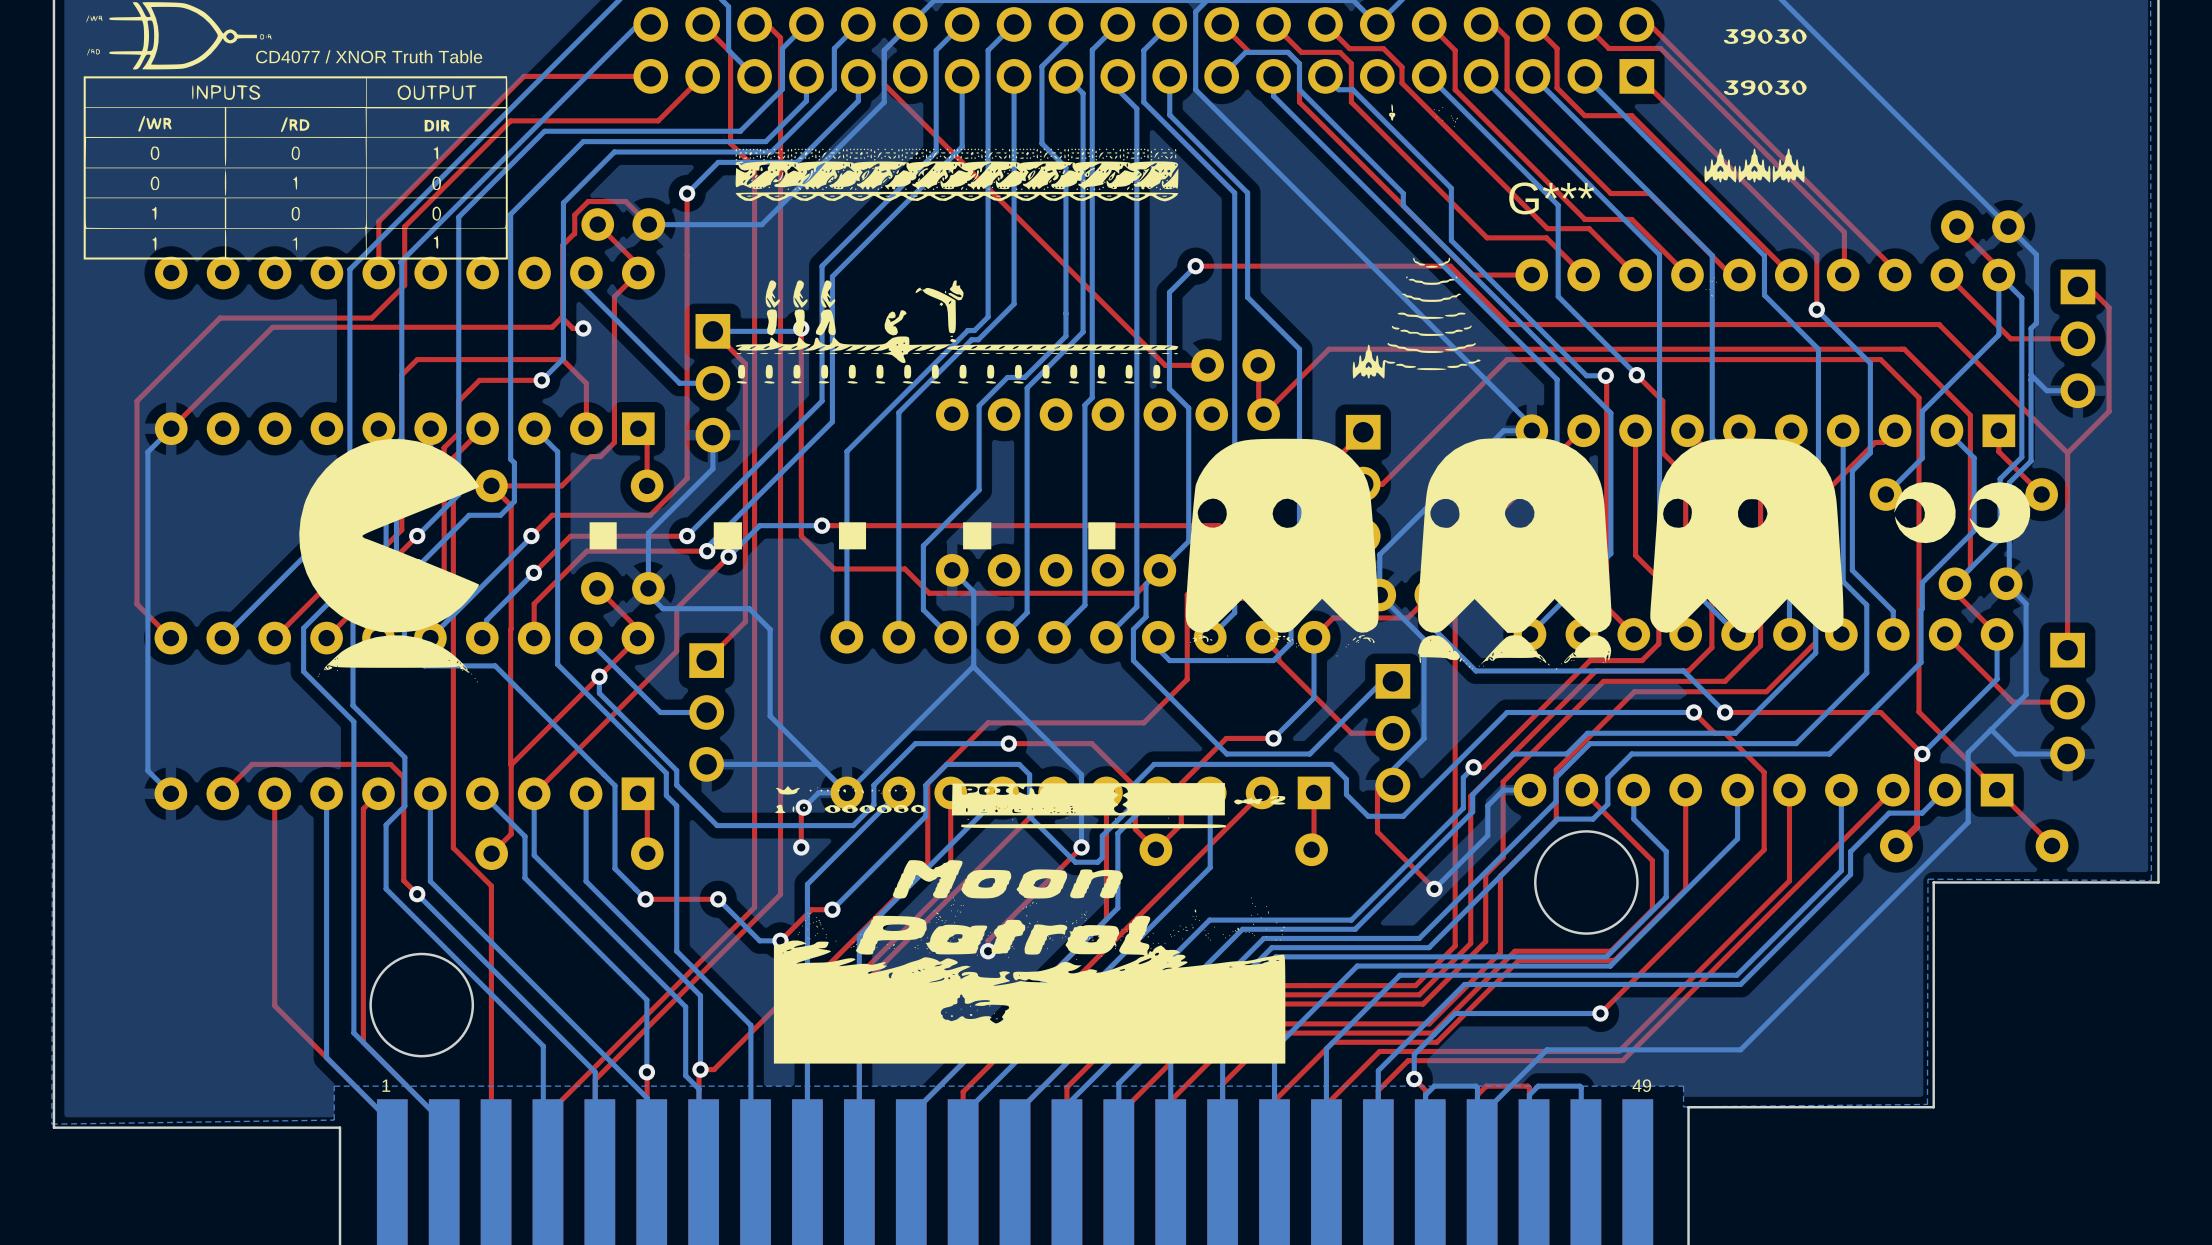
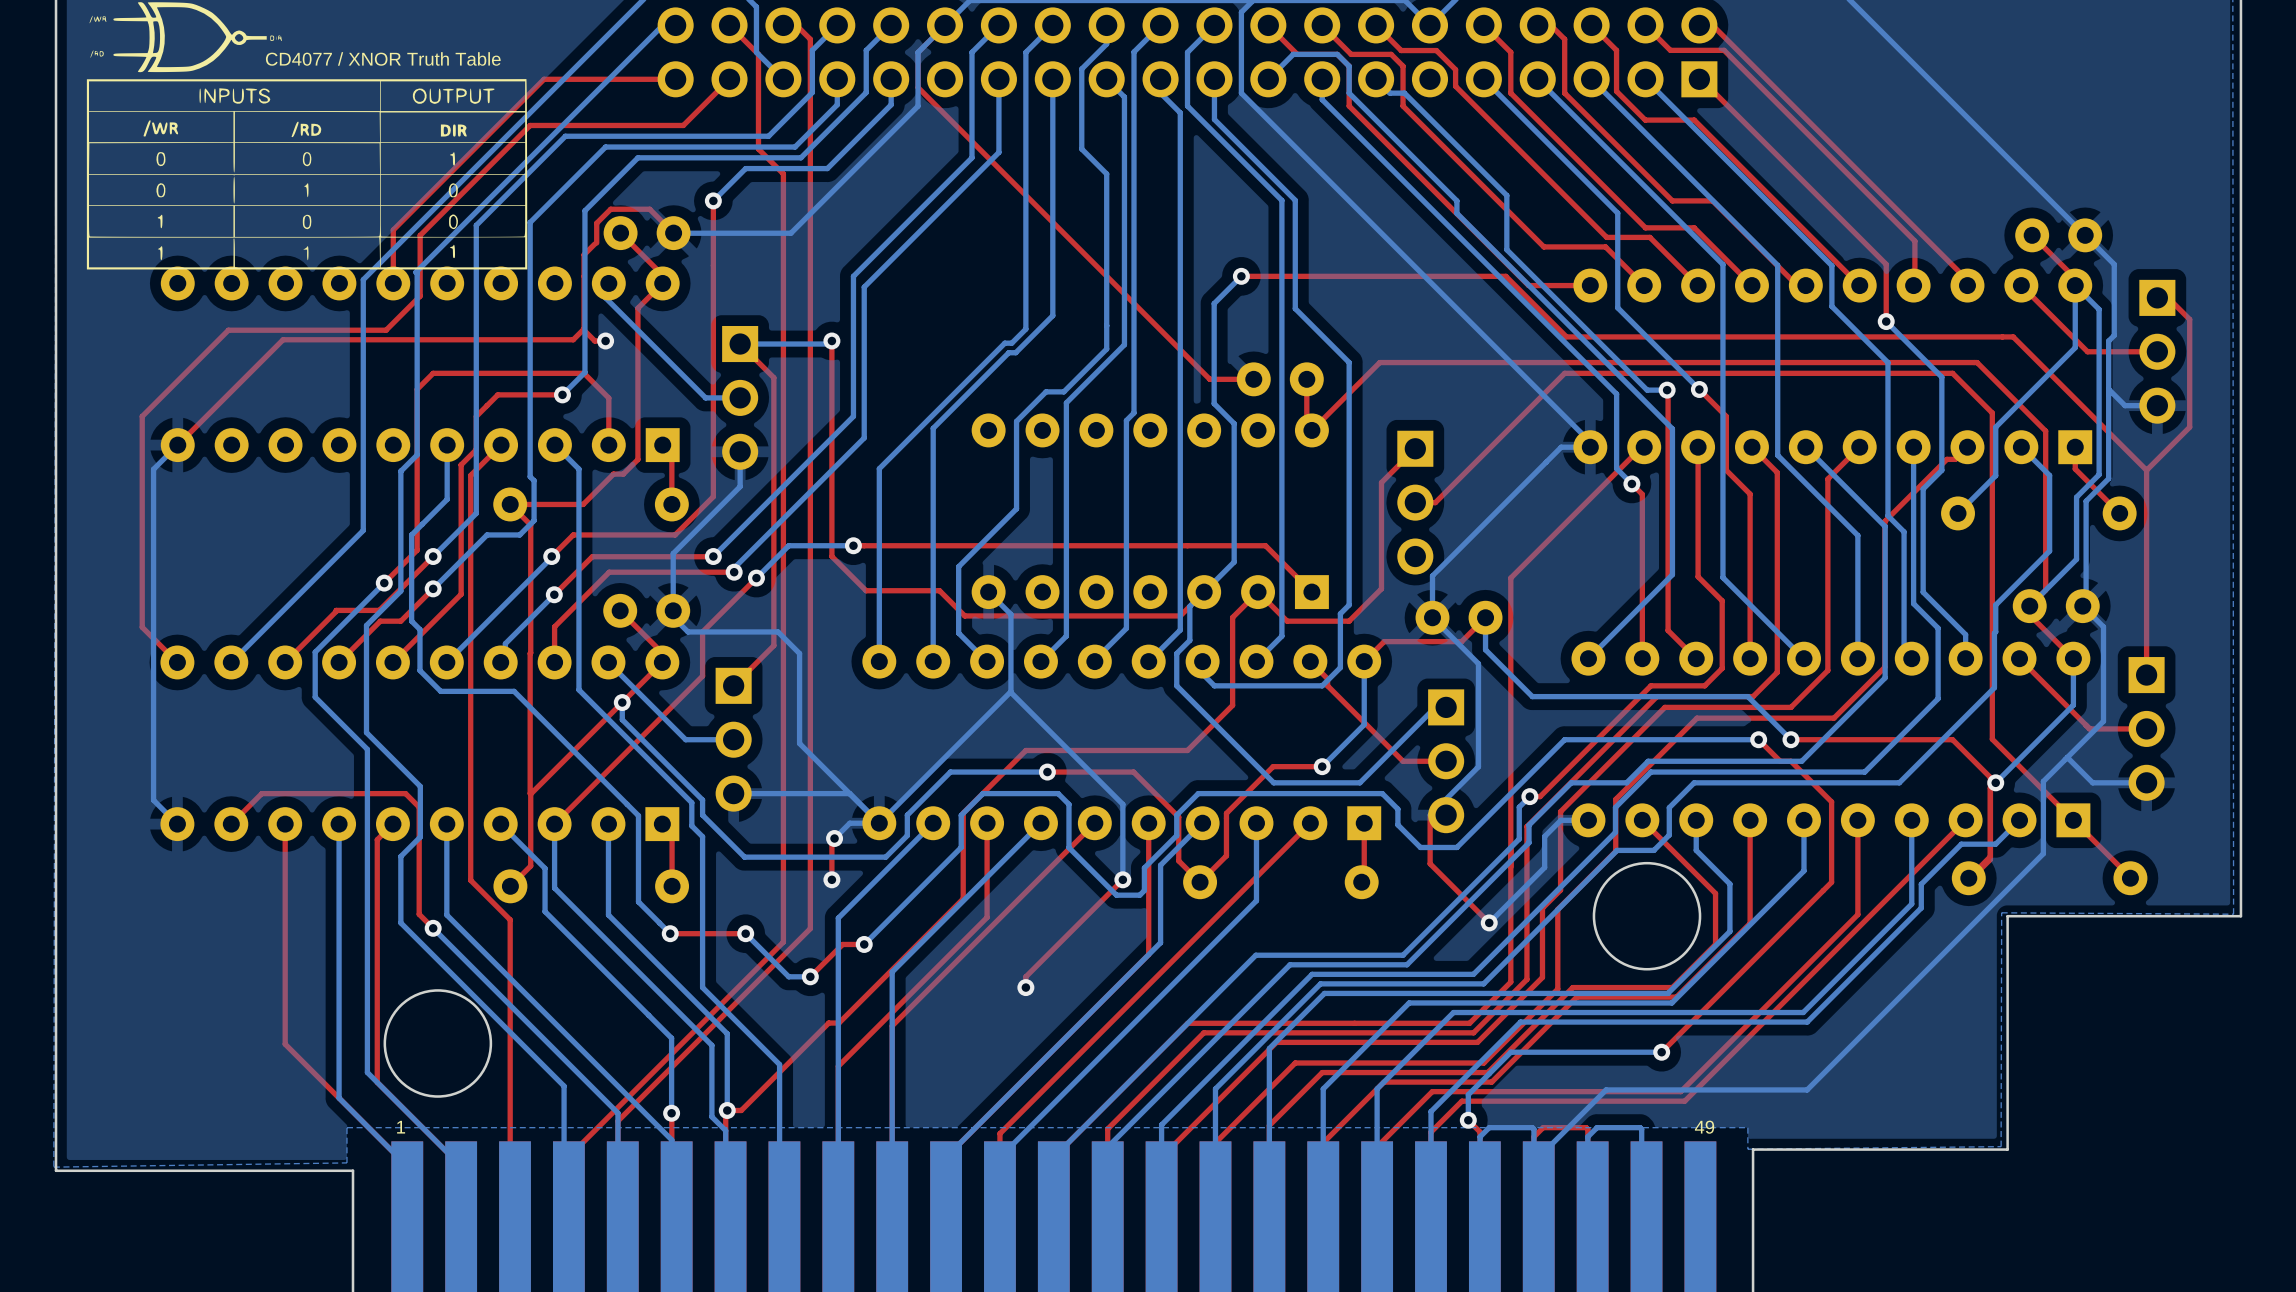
drawing: [735, 148, 1179, 384] -> none
G***: (1579, 203) -> none
drawing: [299, 438, 2031, 683] -> none
drawing: [773, 783, 1286, 1064] -> none

